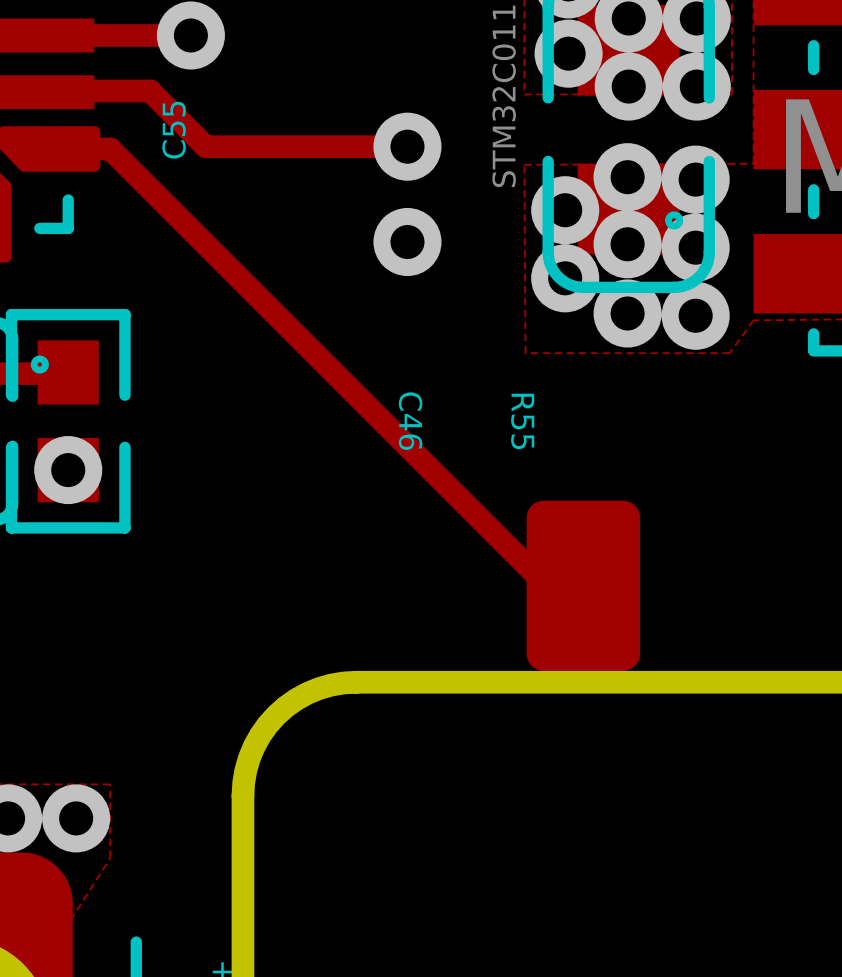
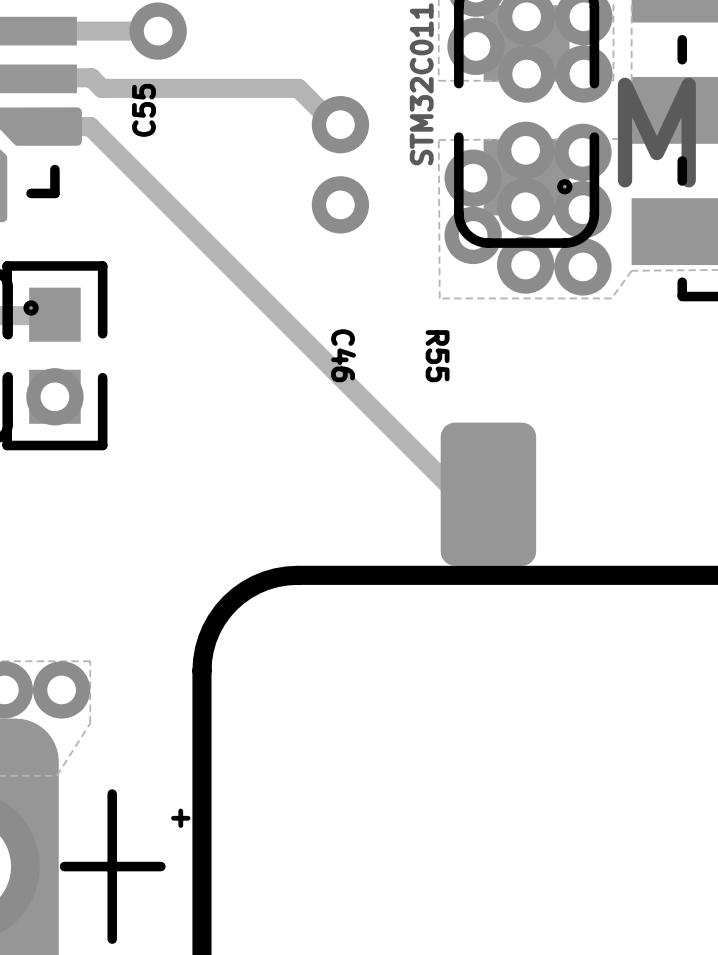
track: (111, 90) (150, 90) (205, 146) (400, 146) -> (91, 77) (101, 88) (298, 88) (334, 124)

